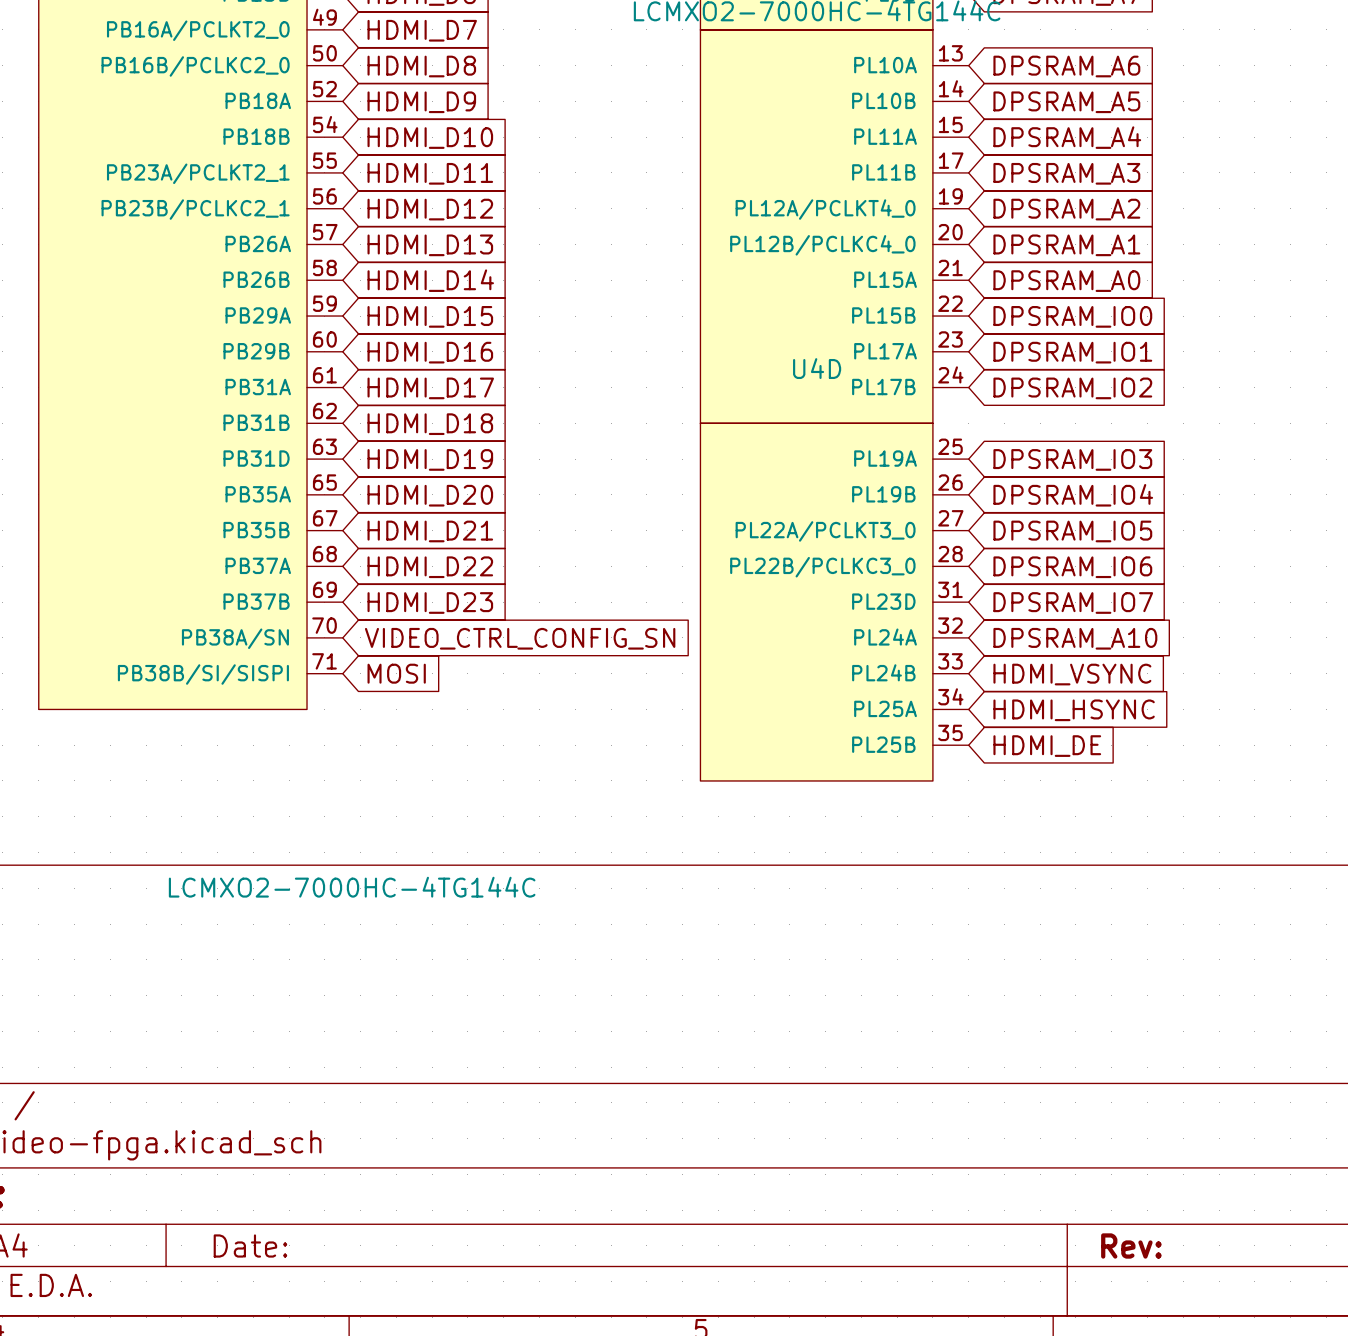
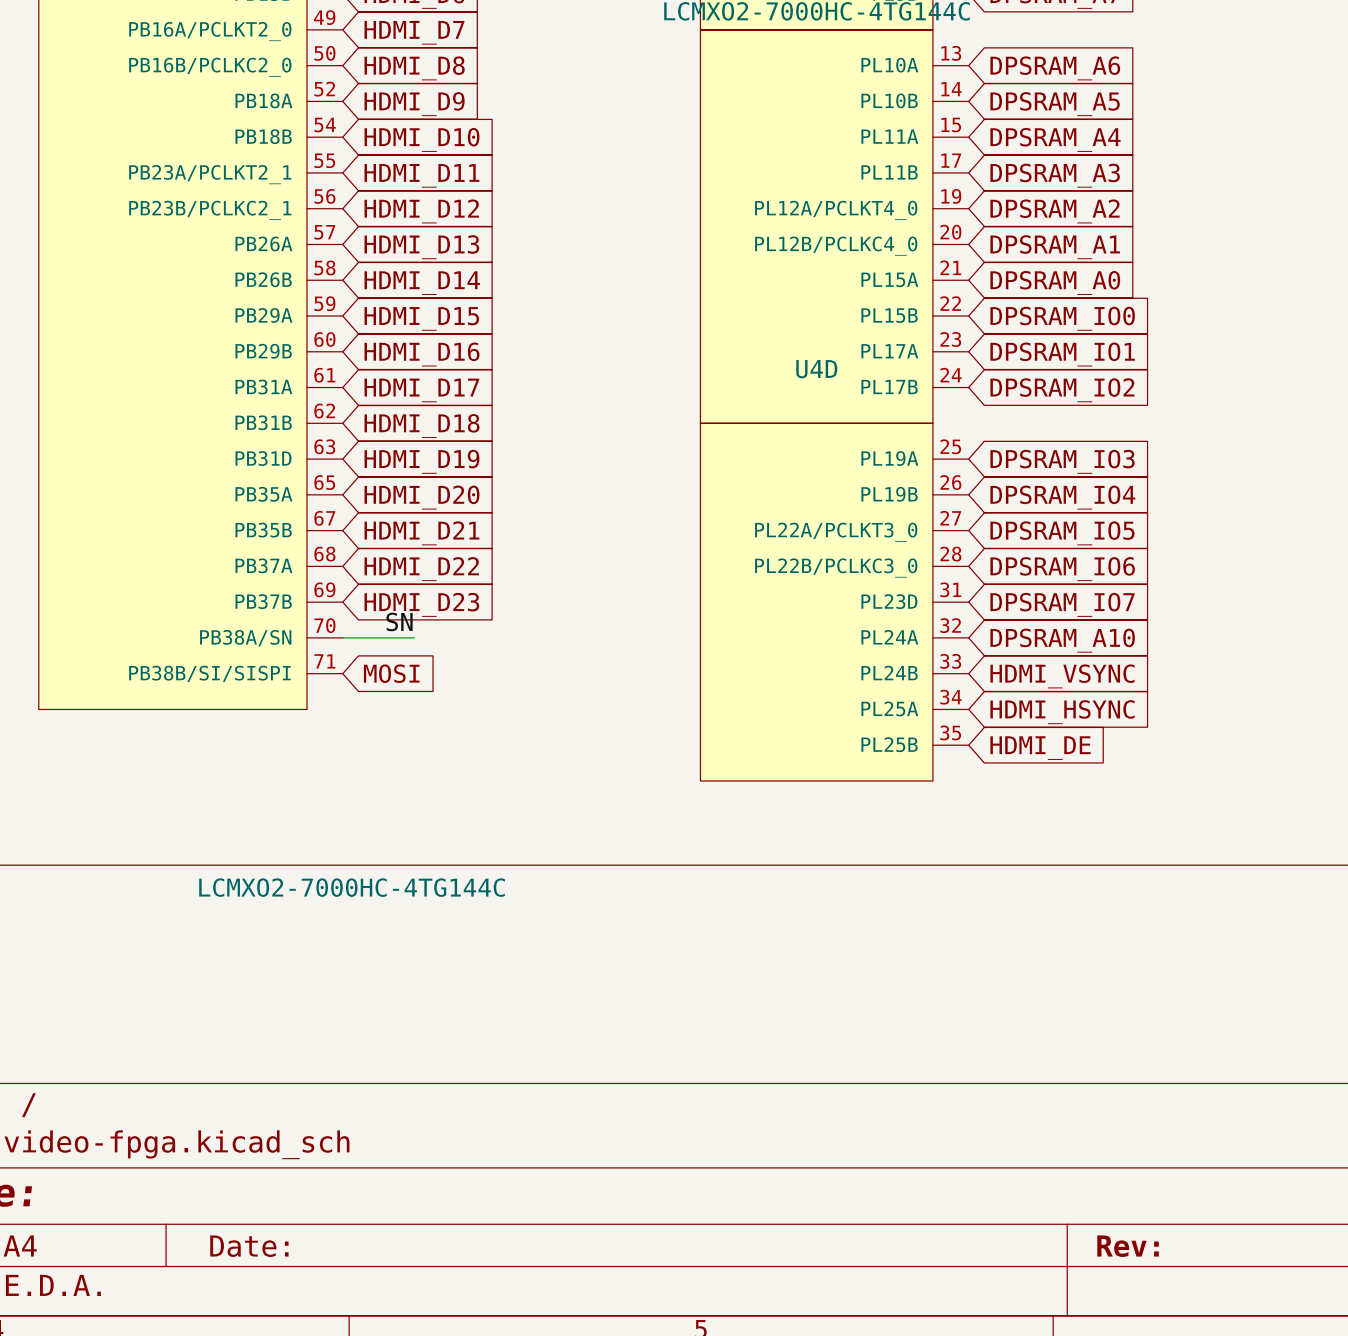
label: none -> SN (399, 621)
wire: none -> (342, 637) (414, 637)
global label: VIDEO_CTRL_CONFIG_SN (520, 638) -> none

